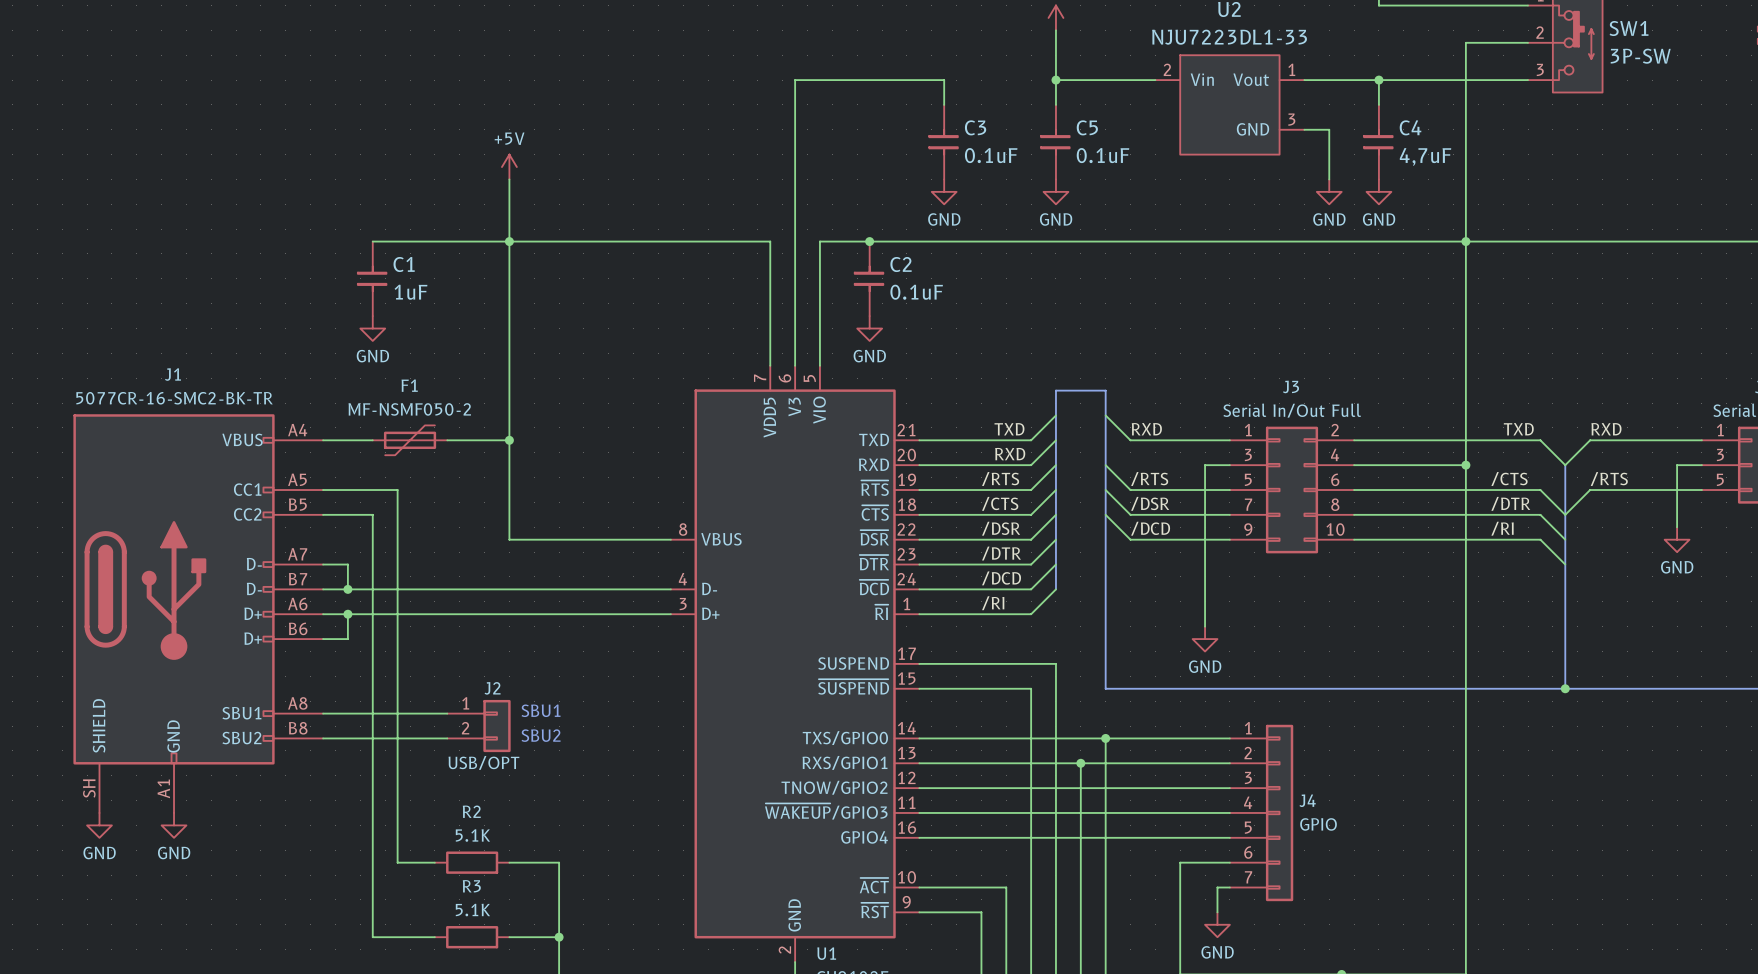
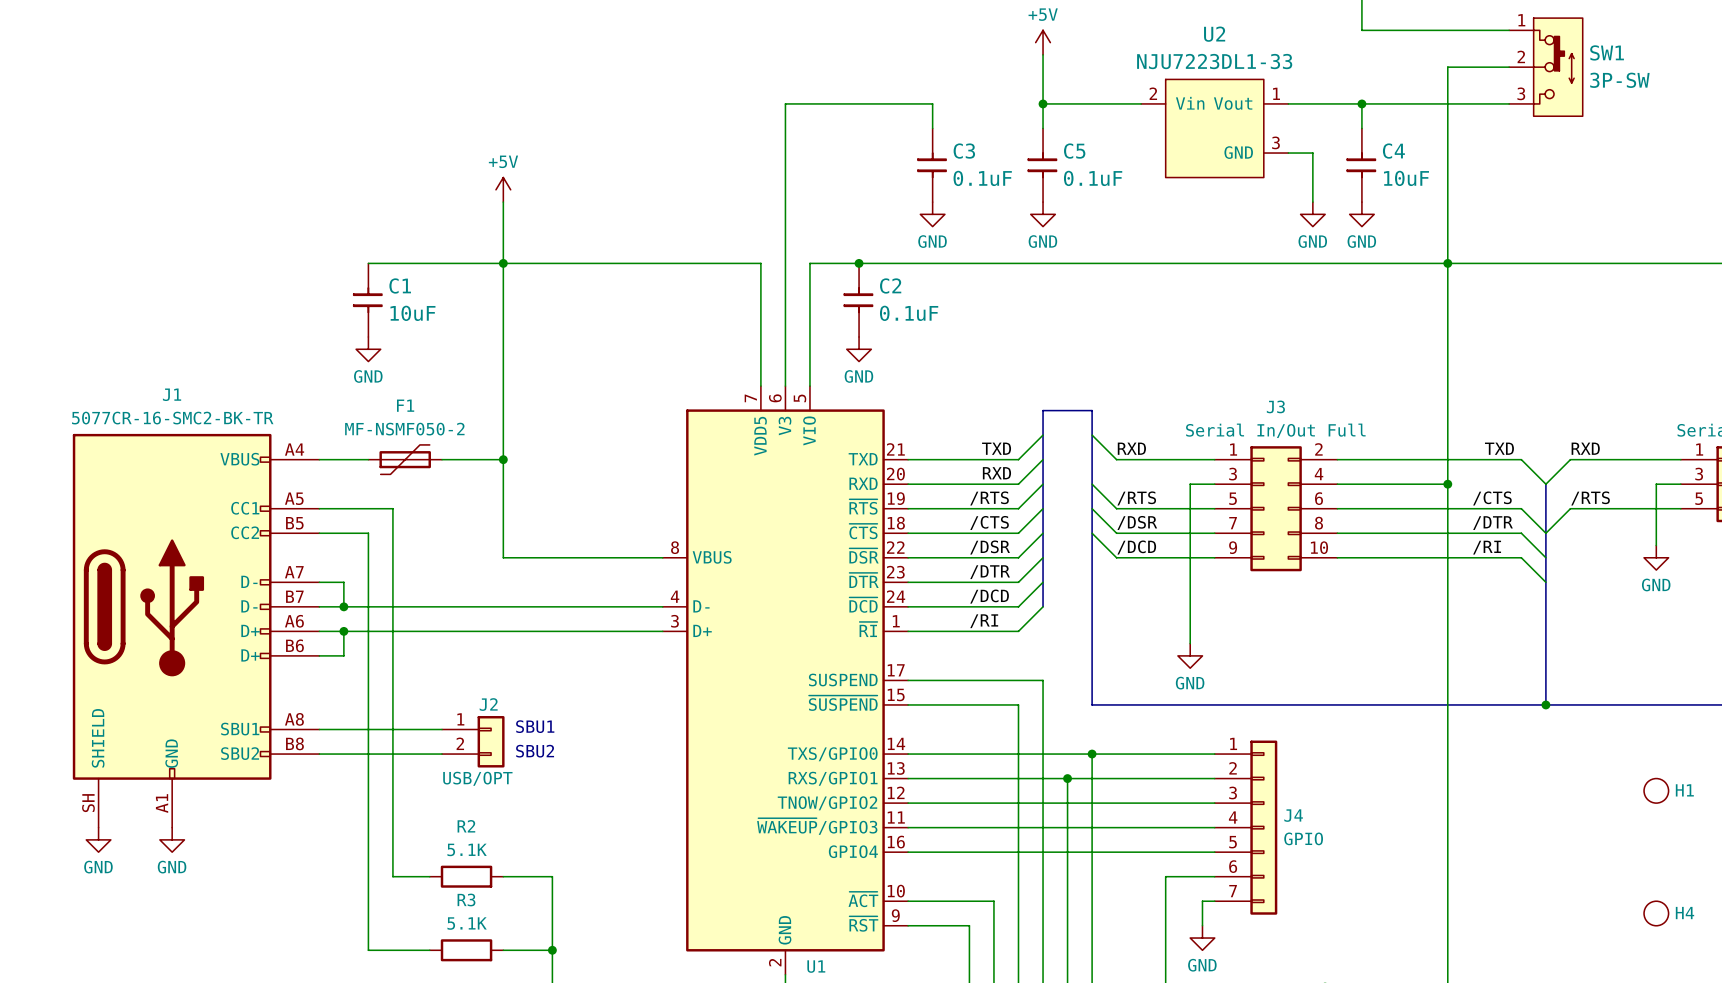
C4 value: 4,7uF (1425, 156) -> 10uF (1406, 178)
C1 value: 1uF (410, 292) -> 10uF (412, 313)
H1: none -> (1656, 790)
H4: none -> (1656, 913)

